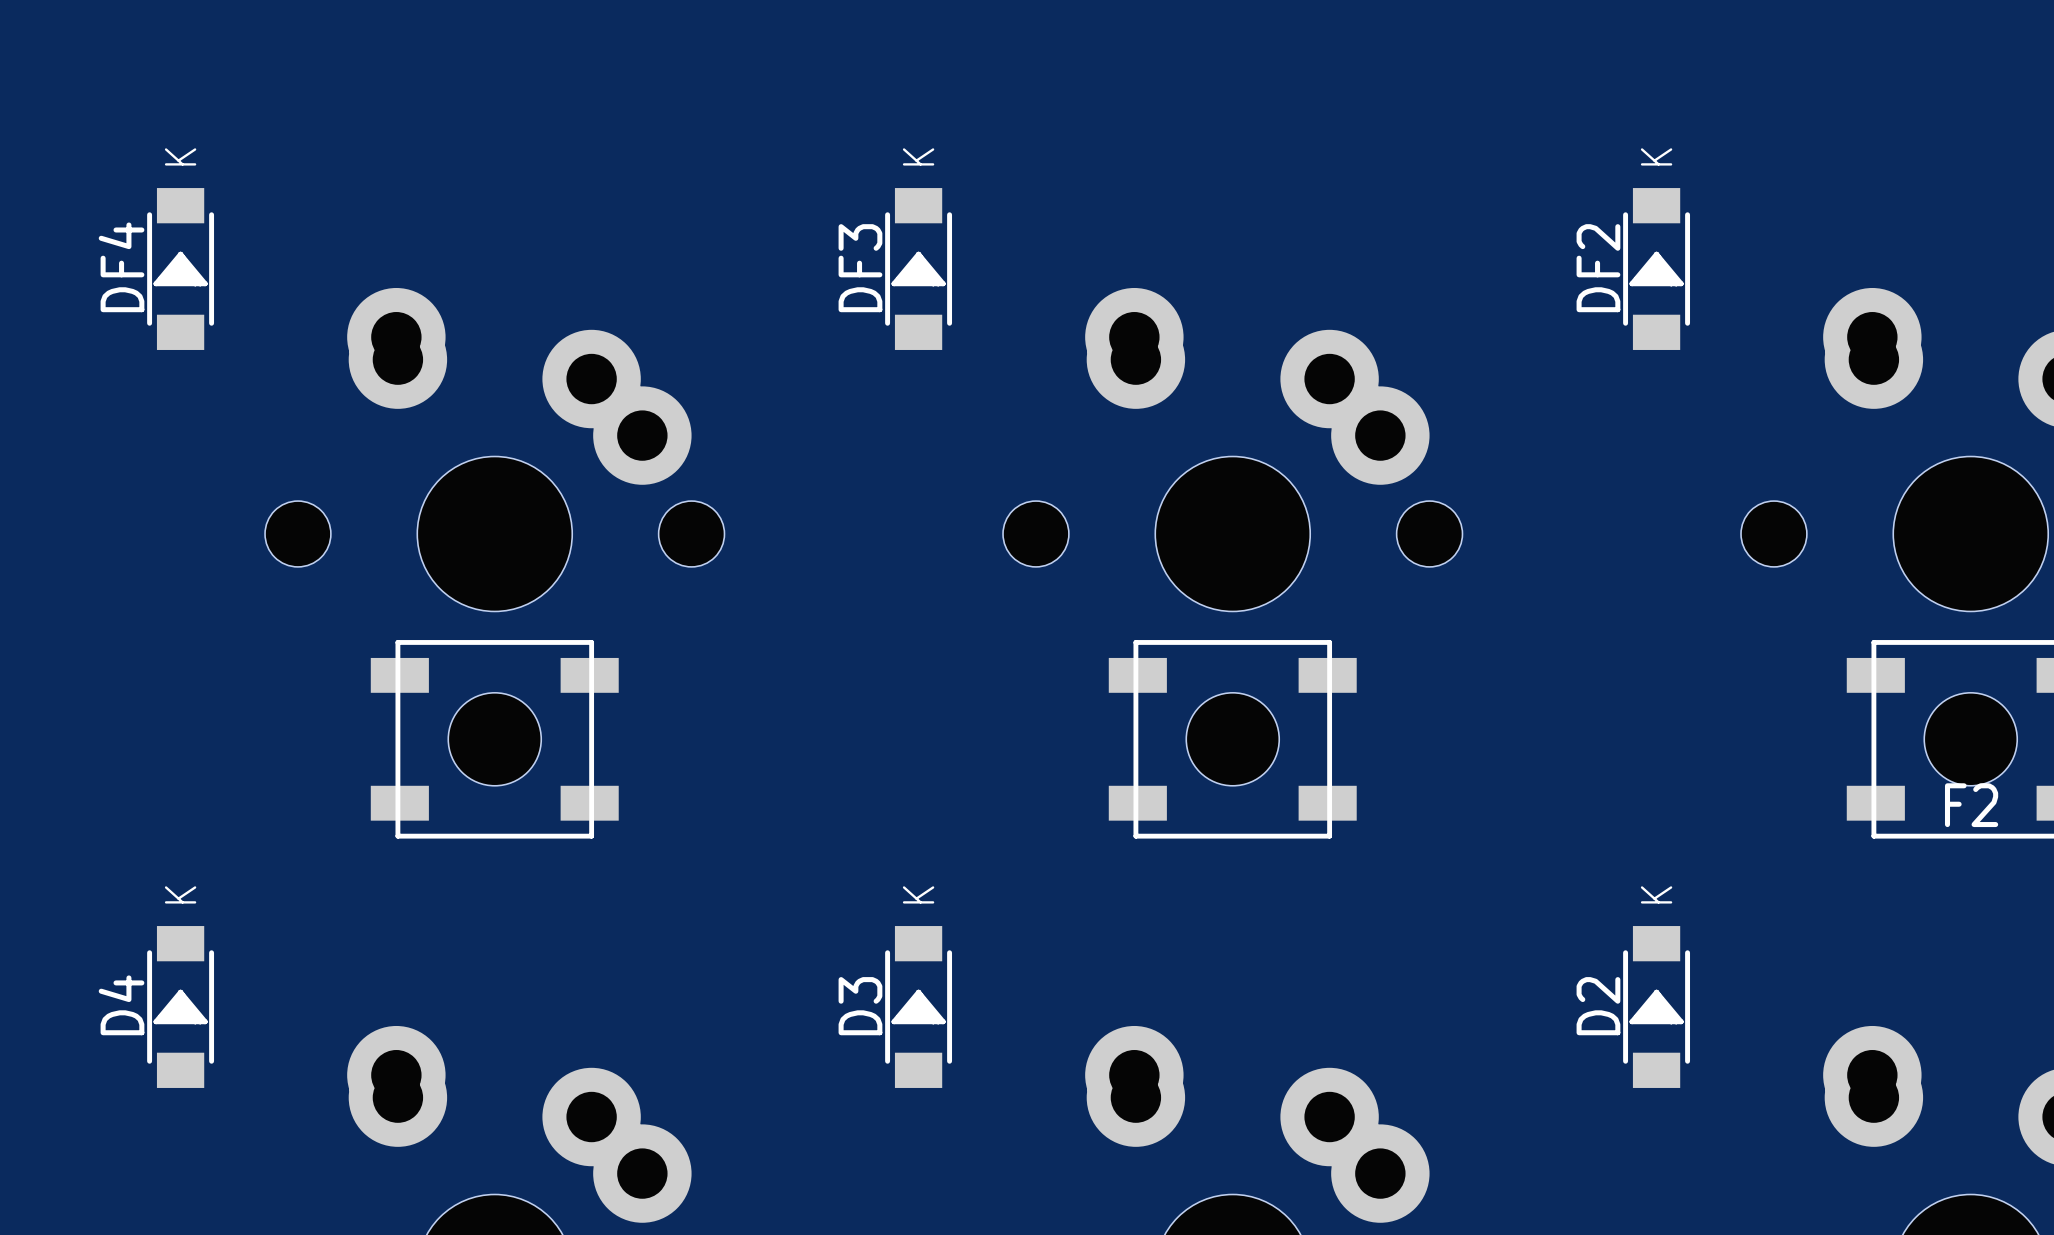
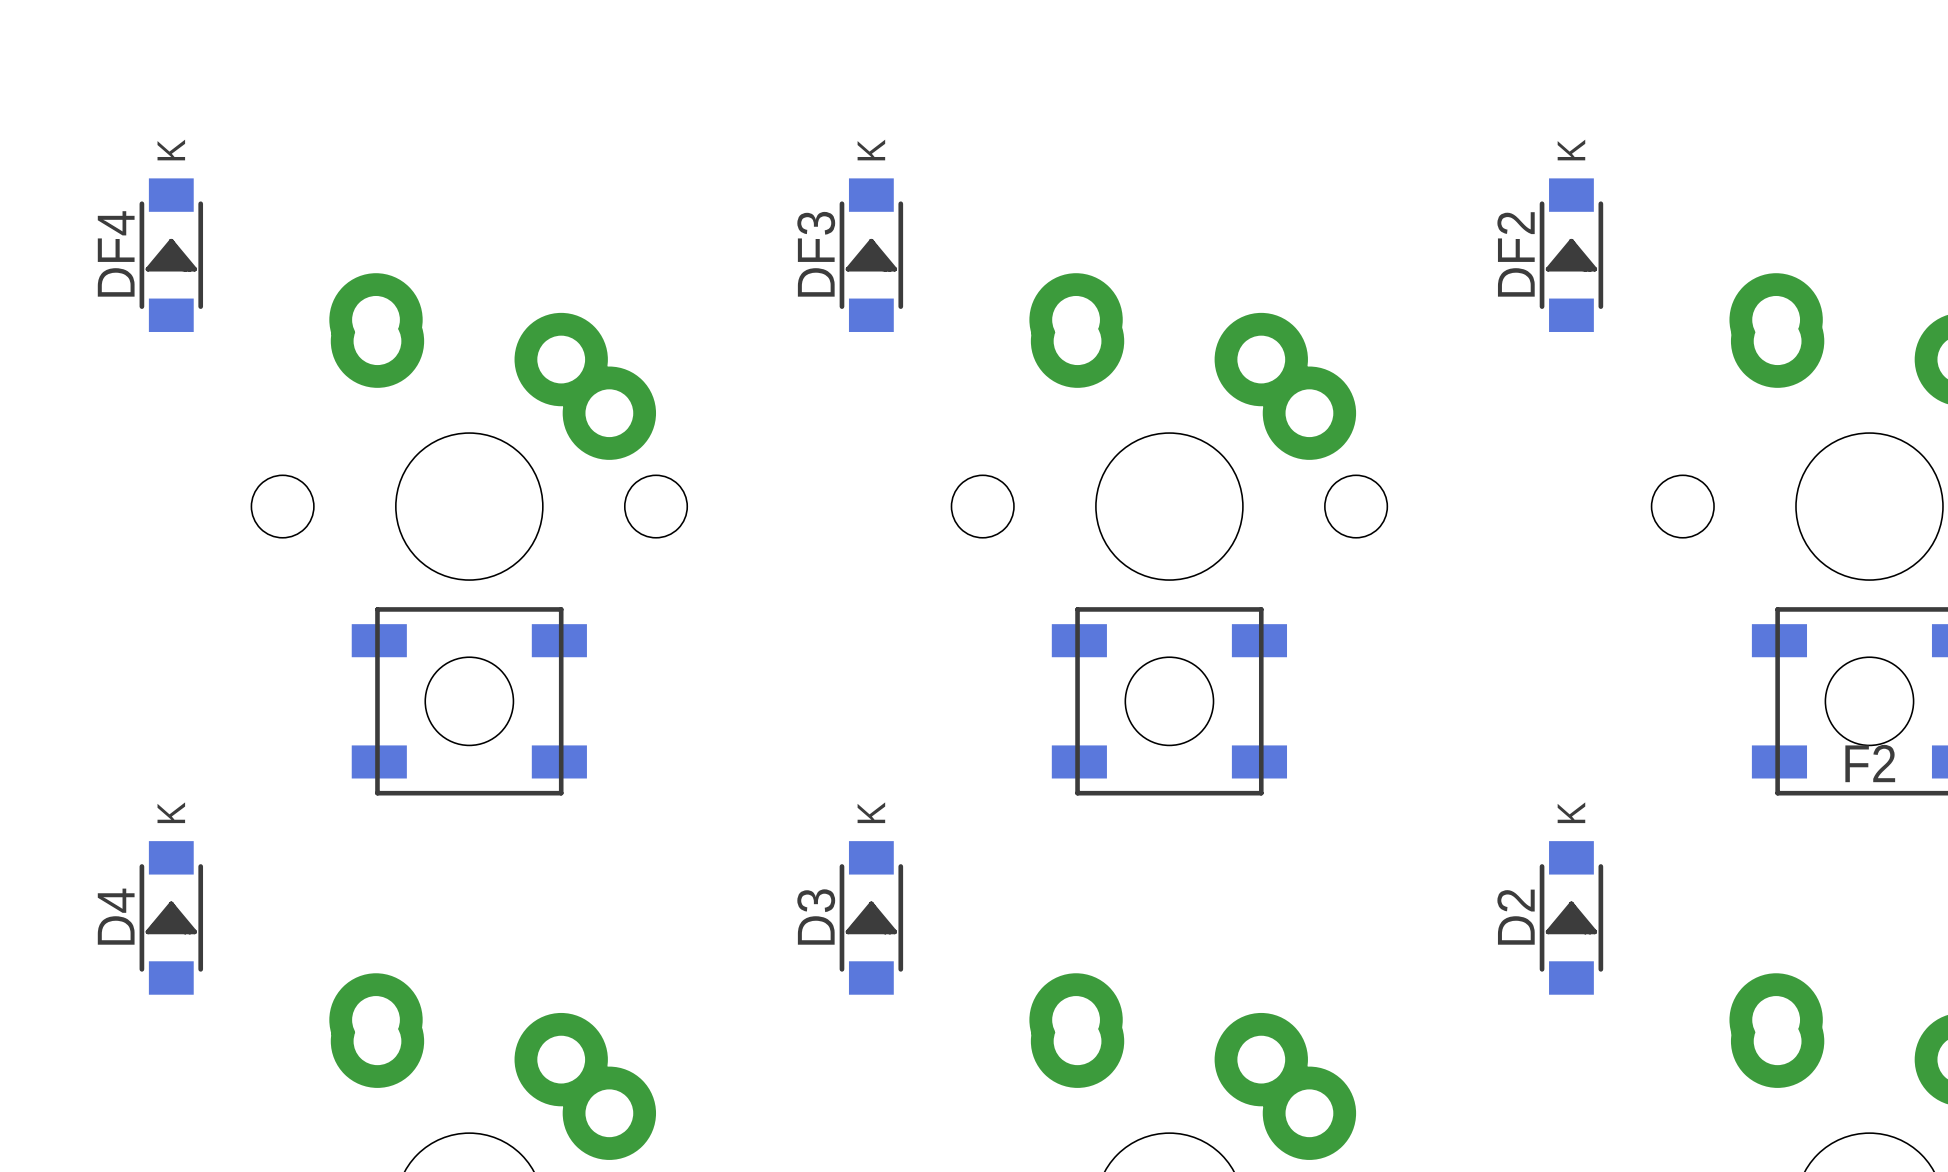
D4 position: (180, 1007) -> (171, 917)
D3 position: (918, 1007) -> (871, 917)
D2 position: (1656, 1007) -> (1571, 917)

